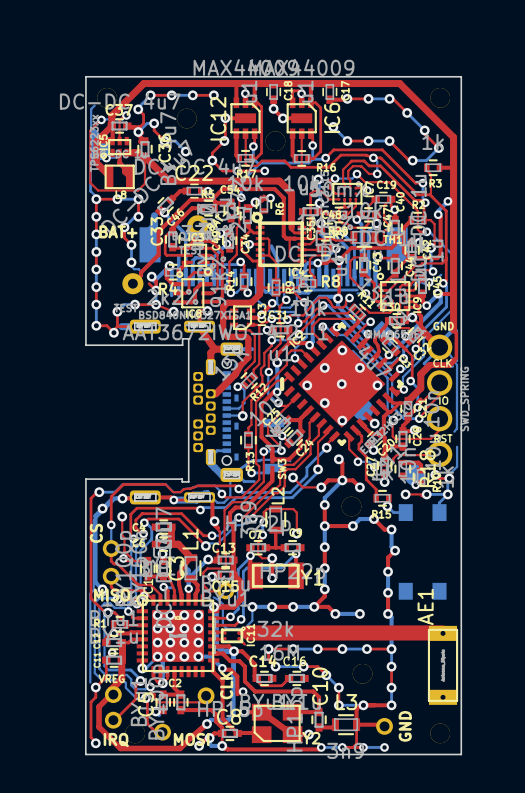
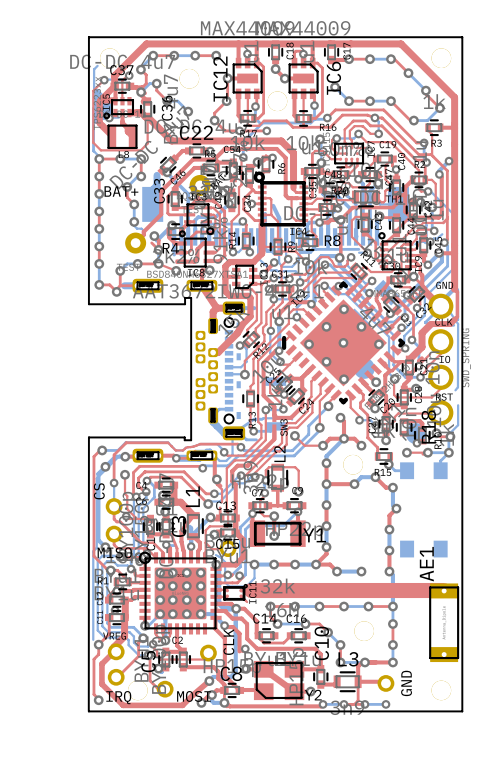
via: (230, 616) -> none
via: none -> (227, 574)
via: none -> (239, 575)
via: (241, 619) -> none

